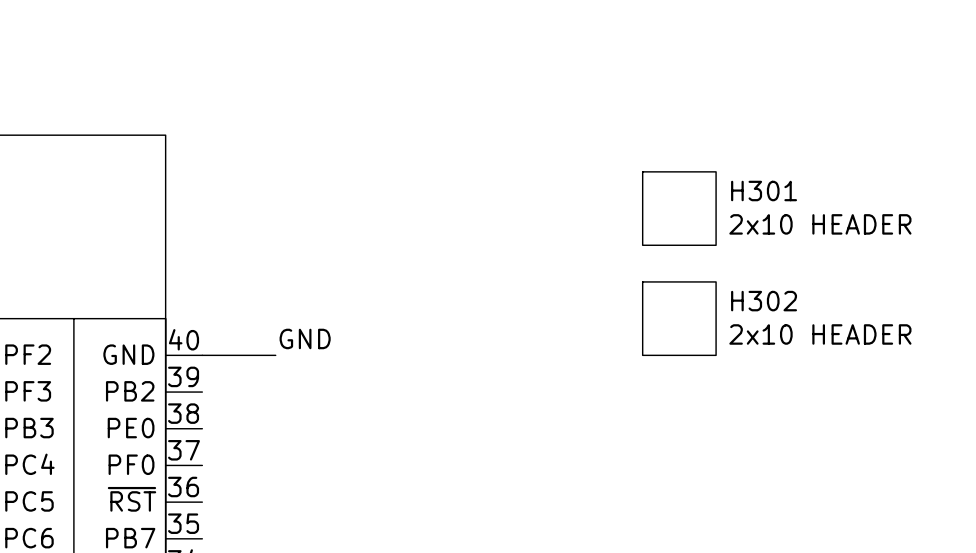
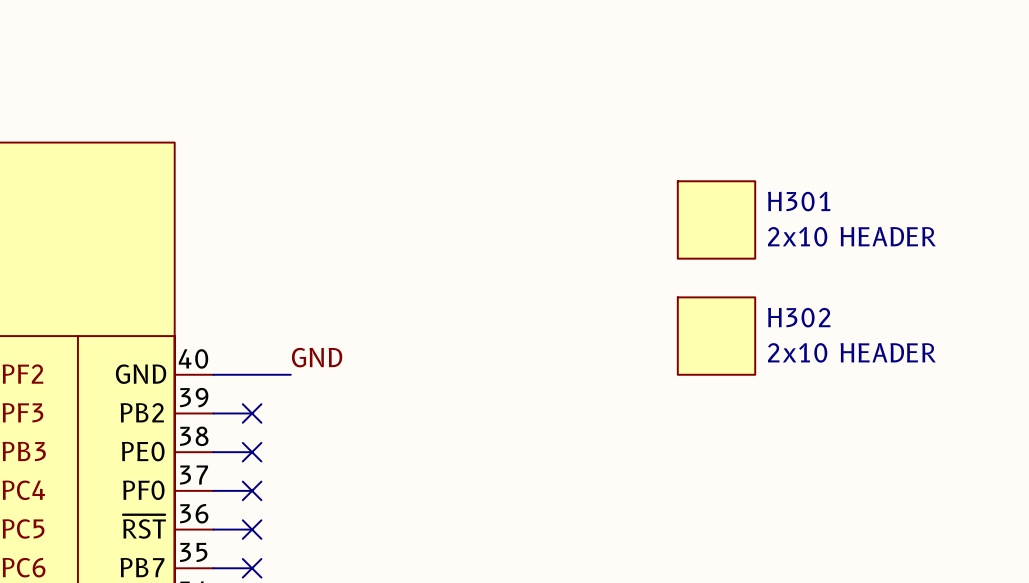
wire: none -> (213, 413) (252, 413)
no-connect mark: none -> (252, 413)
wire: none -> (213, 452) (252, 452)
no-connect mark: none -> (252, 452)
wire: none -> (213, 490) (252, 490)
no-connect mark: none -> (252, 490)
wire: none -> (213, 529) (252, 529)
no-connect mark: none -> (252, 529)
wire: none -> (213, 568) (252, 568)
no-connect mark: none -> (252, 568)

